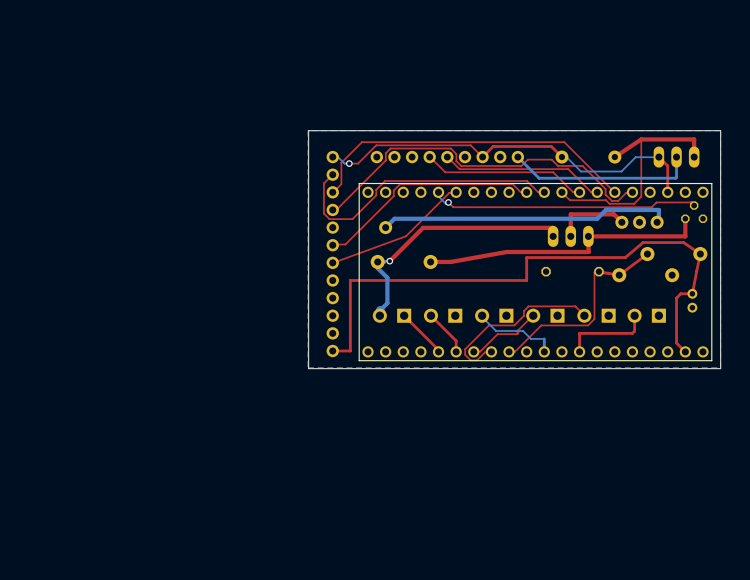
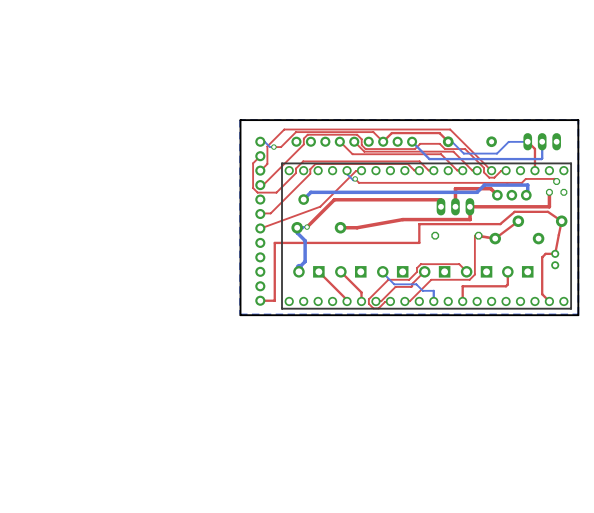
top track: (641, 139) (694, 139) (694, 157) -> none
top track: (641, 139) (614, 157) -> none
top track: (641, 139) (641, 196) (634, 203) (609, 203) (606, 200) (569, 200) (561, 192) -> none

